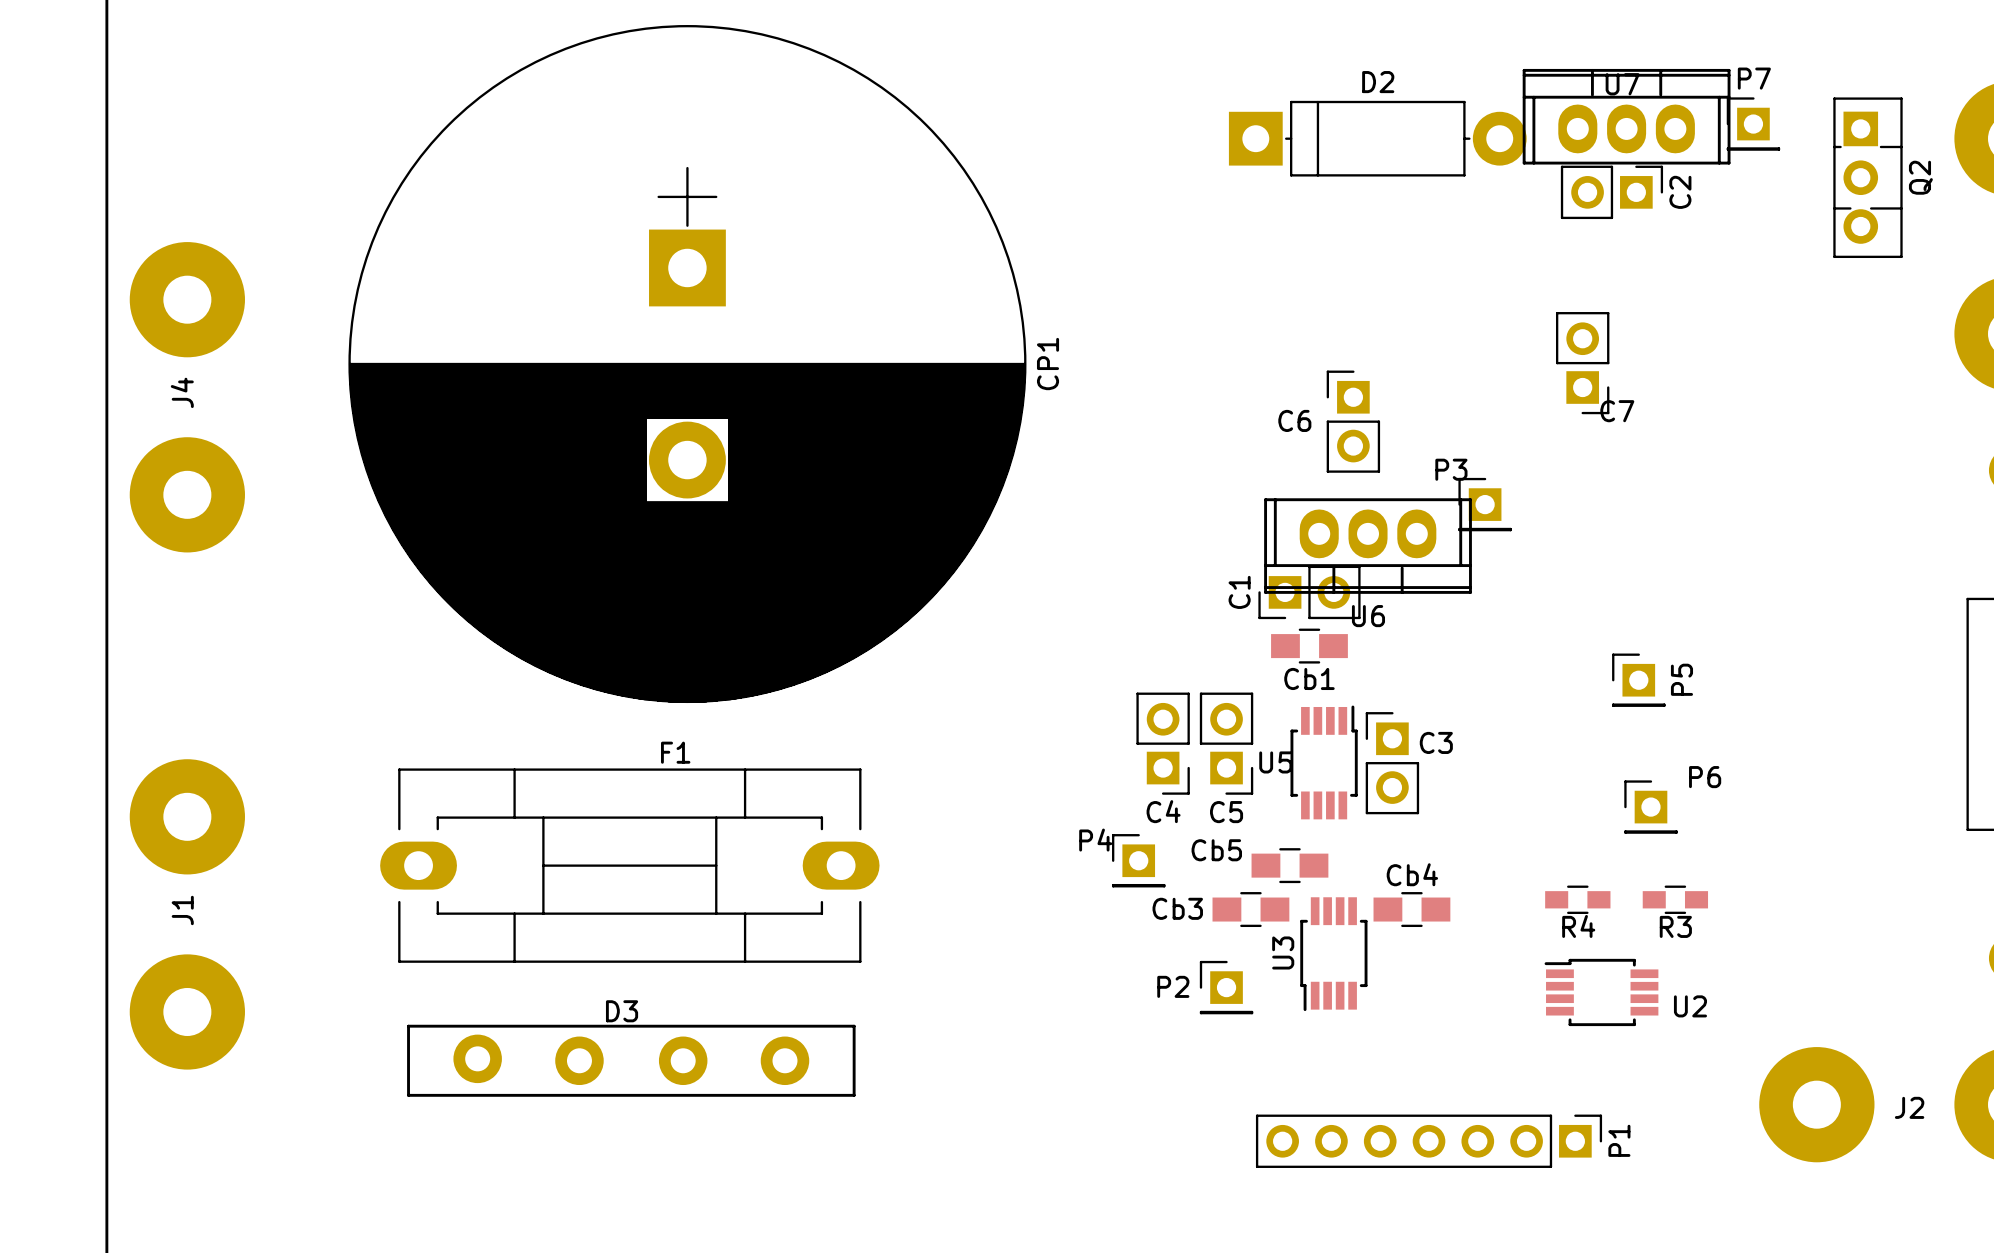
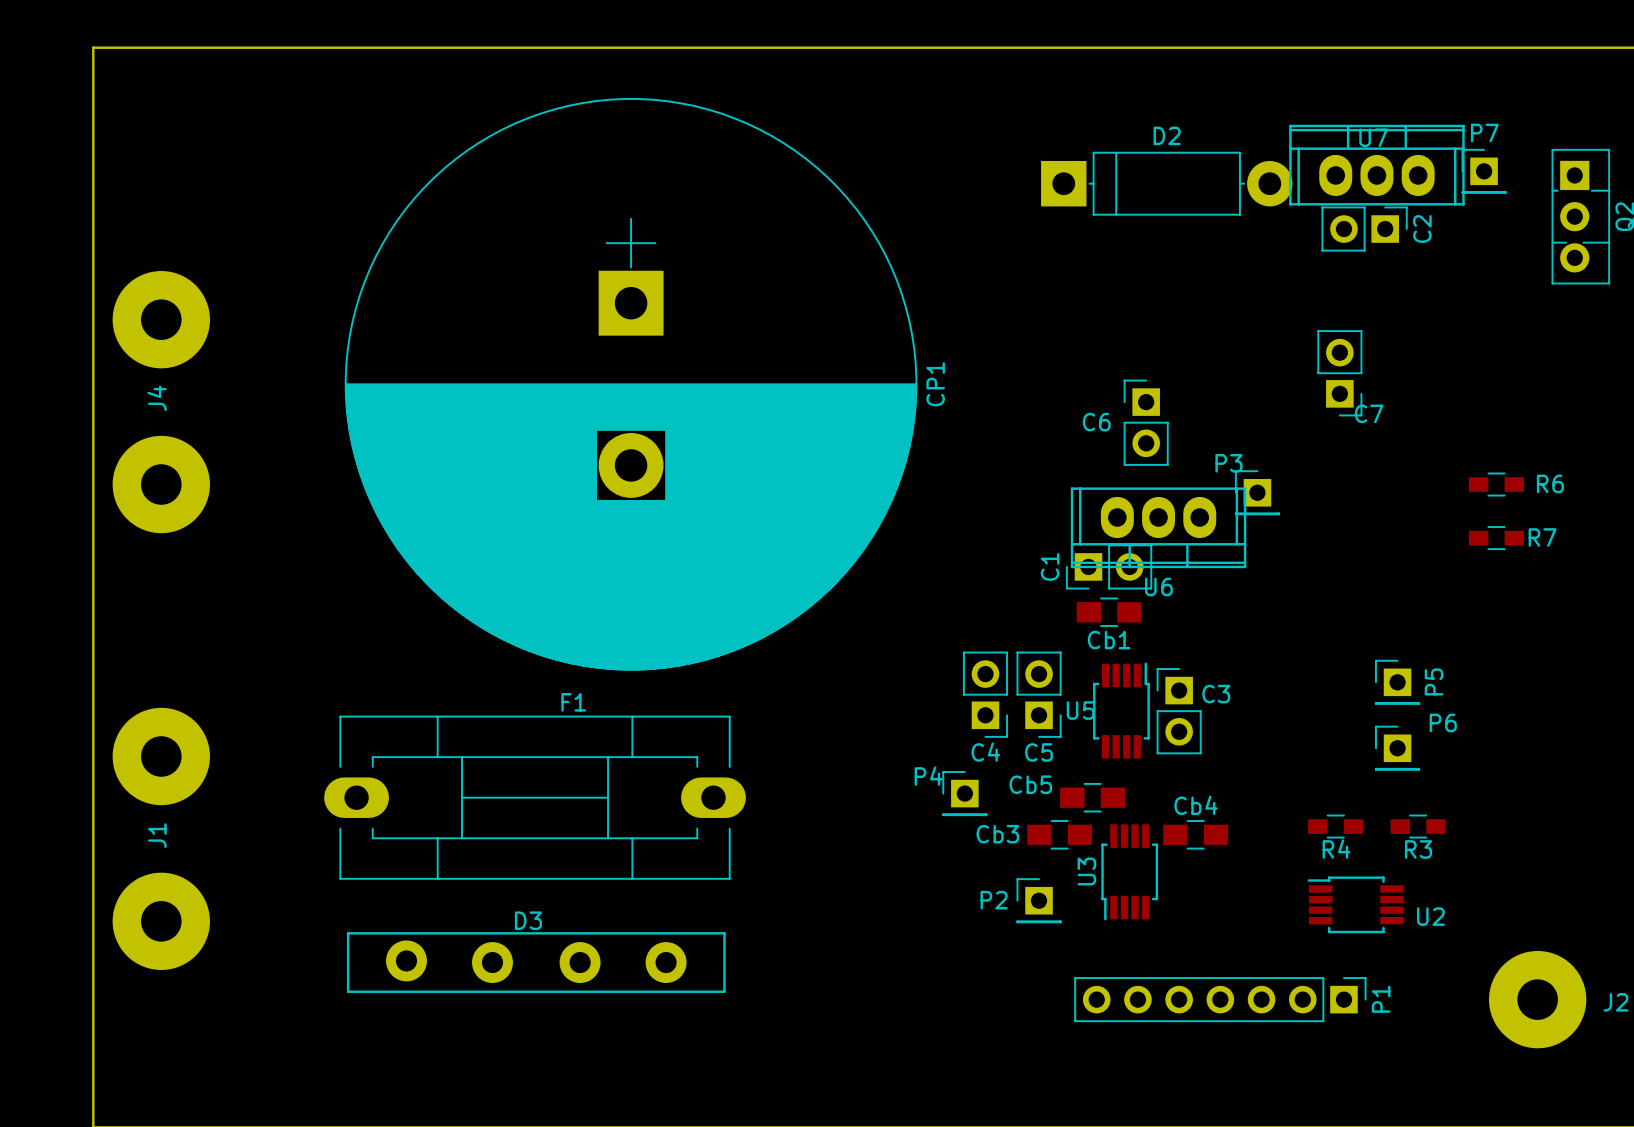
CP1 position: (687, 364) -> (631, 384)
R6: none -> (1496, 484)
R7: none -> (1496, 538)
P5 position: (1638, 680) -> (1397, 682)
P1 position: (1429, 1141) -> (1220, 999)

